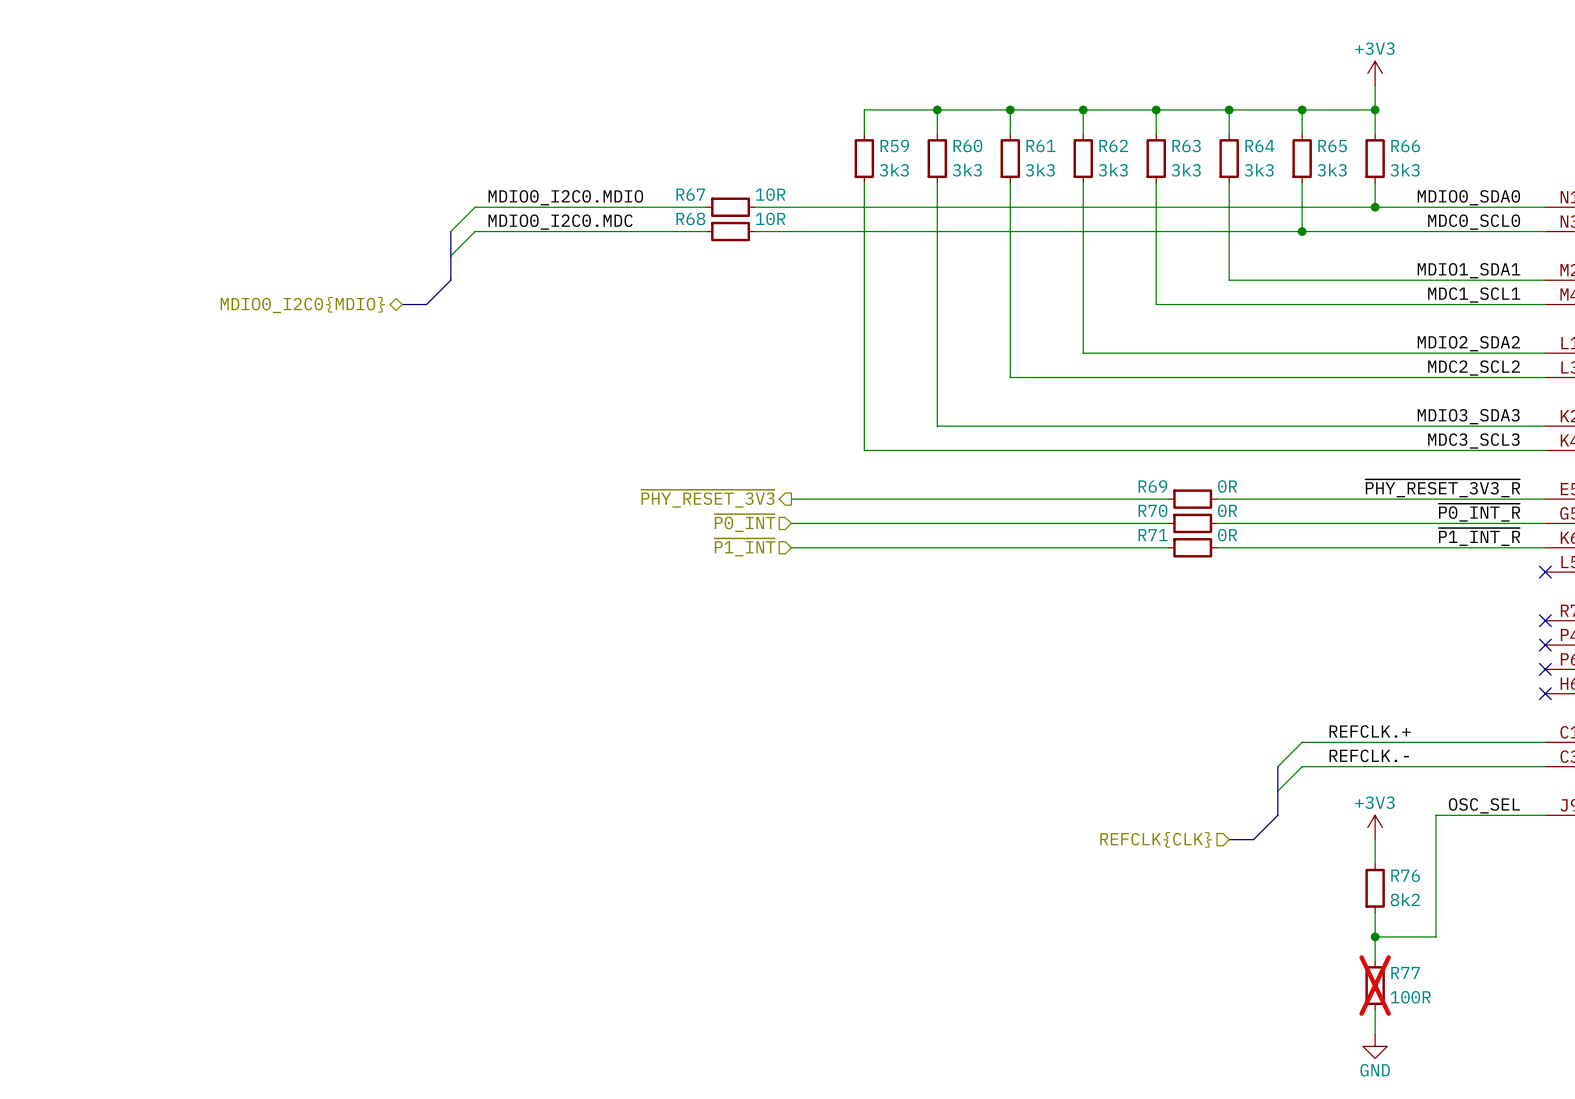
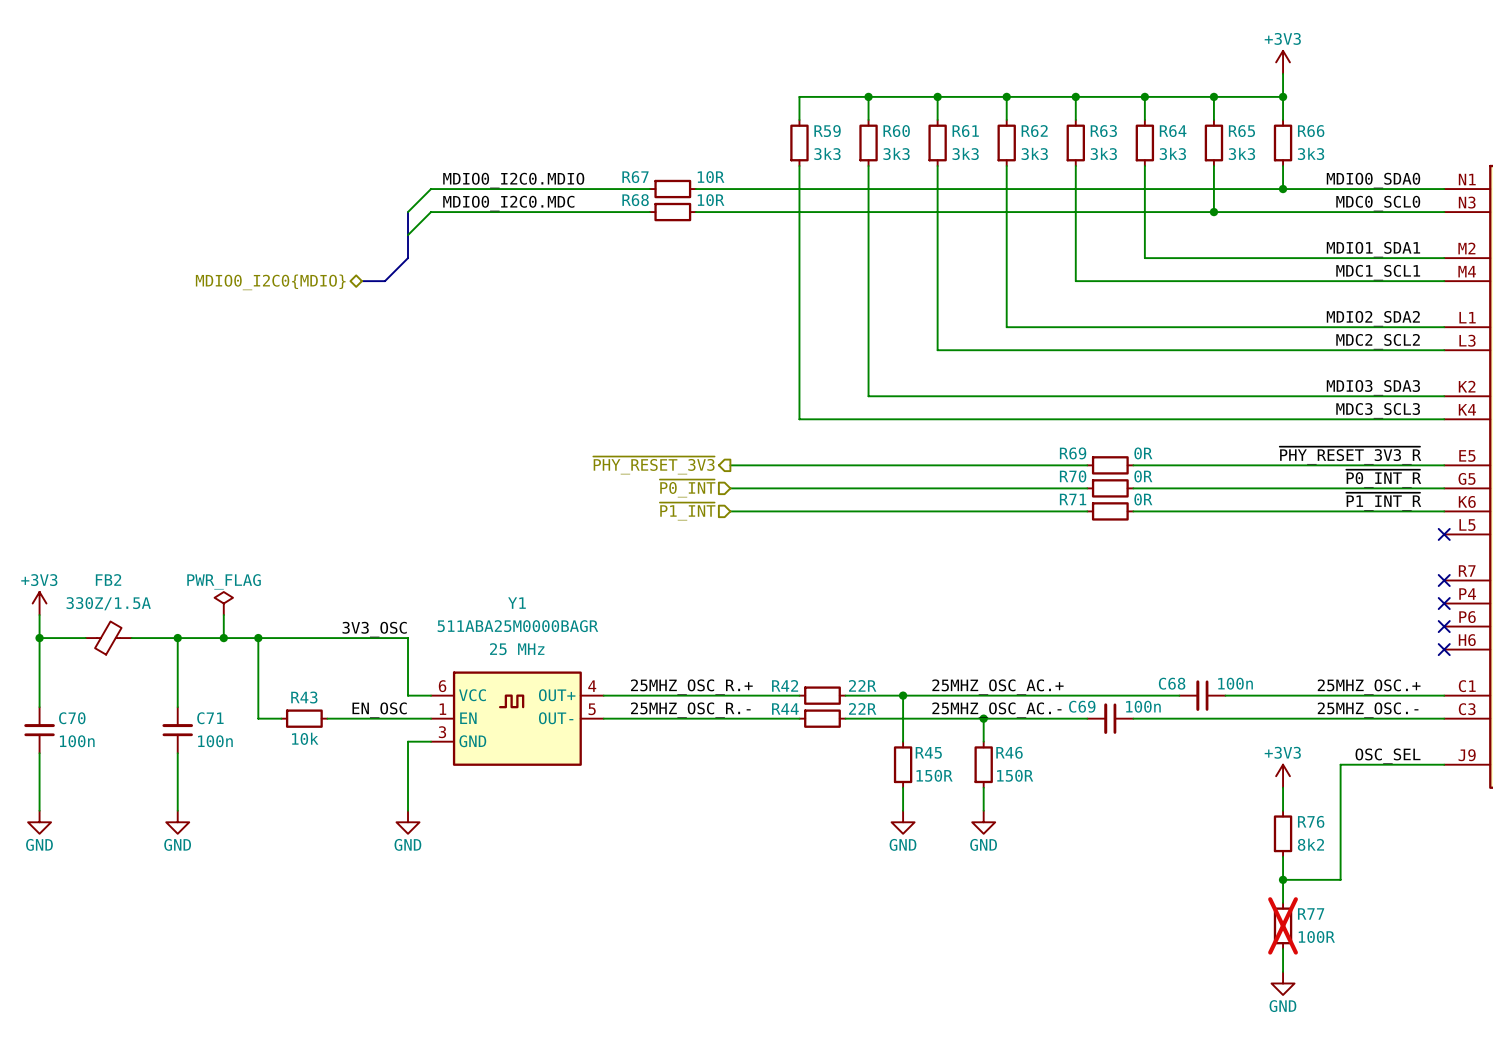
power symbol: none -> +3V3 (39, 603)
power symbol: none -> PWR_FLAG (223, 603)
wire: none -> (39, 615) (39, 707)
wire: none -> (223, 615) (223, 638)
label: none -> 3V3_OSC (374, 629)
wire: none -> (39, 638) (85, 638)
junction: none -> (39, 638)
FB2: none -> (108, 638)
wire: none -> (131, 638) (408, 638) (408, 695) (431, 695)
wire: none -> (177, 638) (177, 707)
junction: none -> (177, 638)
junction: none -> (223, 638)
wire: none -> (258, 638) (258, 718) (281, 718)
junction: none -> (258, 638)
label: REFCLK.+ (1370, 731) -> none
label: none -> 25MHZ_OSC_R.+ (691, 687)
label: none -> 25MHZ_OSC_AC.+ (997, 687)
label: none -> 25MHZ_OSC.+ (1369, 687)
wire: none -> (603, 695) (799, 695)
R42: none -> (822, 695)
wire: none -> (845, 695) (1179, 695)
wire: none -> (903, 695) (903, 741)
junction: none -> (903, 695)
C68: none -> (1202, 695)
wire: (1314, 742) (1302, 742) (1277, 766) -> none
label: REFCLK.- (1369, 755) -> none
label: none -> EN_OSC (379, 710)
label: none -> 25MHZ_OSC_R.- (690, 710)
label: none -> 25MHZ_OSC_AC.- (996, 710)
label: none -> 25MHZ_OSC.- (1368, 710)
R43: none -> (304, 718)
wire: none -> (327, 718) (431, 718)
Y1: none -> (517, 718)
wire: none -> (603, 718) (799, 718)
R44: none -> (822, 718)
wire: none -> (845, 718) (1087, 718)
wire: none -> (983, 718) (983, 741)
junction: none -> (983, 718)
C69: none -> (1110, 718)
bus: (1277, 766) (1277, 815) (1253, 839) (1229, 839) -> none
wire: (1302, 766) (1277, 791) -> (1213, 718) (1133, 718)
C70: none -> (39, 730)
C71: none -> (177, 730)
wire: none -> (431, 741) (408, 741) (408, 810)
wire: none -> (39, 753) (39, 810)
wire: none -> (177, 753) (177, 810)
R45: none -> (903, 764)
R46: none -> (983, 764)
wire: none -> (903, 787) (903, 810)
wire: none -> (983, 787) (983, 810)
hierarchical label: REFCLK{CLK} (1156, 839) -> none
power symbol: none -> GND (39, 822)
power symbol: none -> GND (177, 822)
power symbol: none -> GND (408, 822)
power symbol: none -> GND (903, 822)
power symbol: none -> GND (983, 822)

